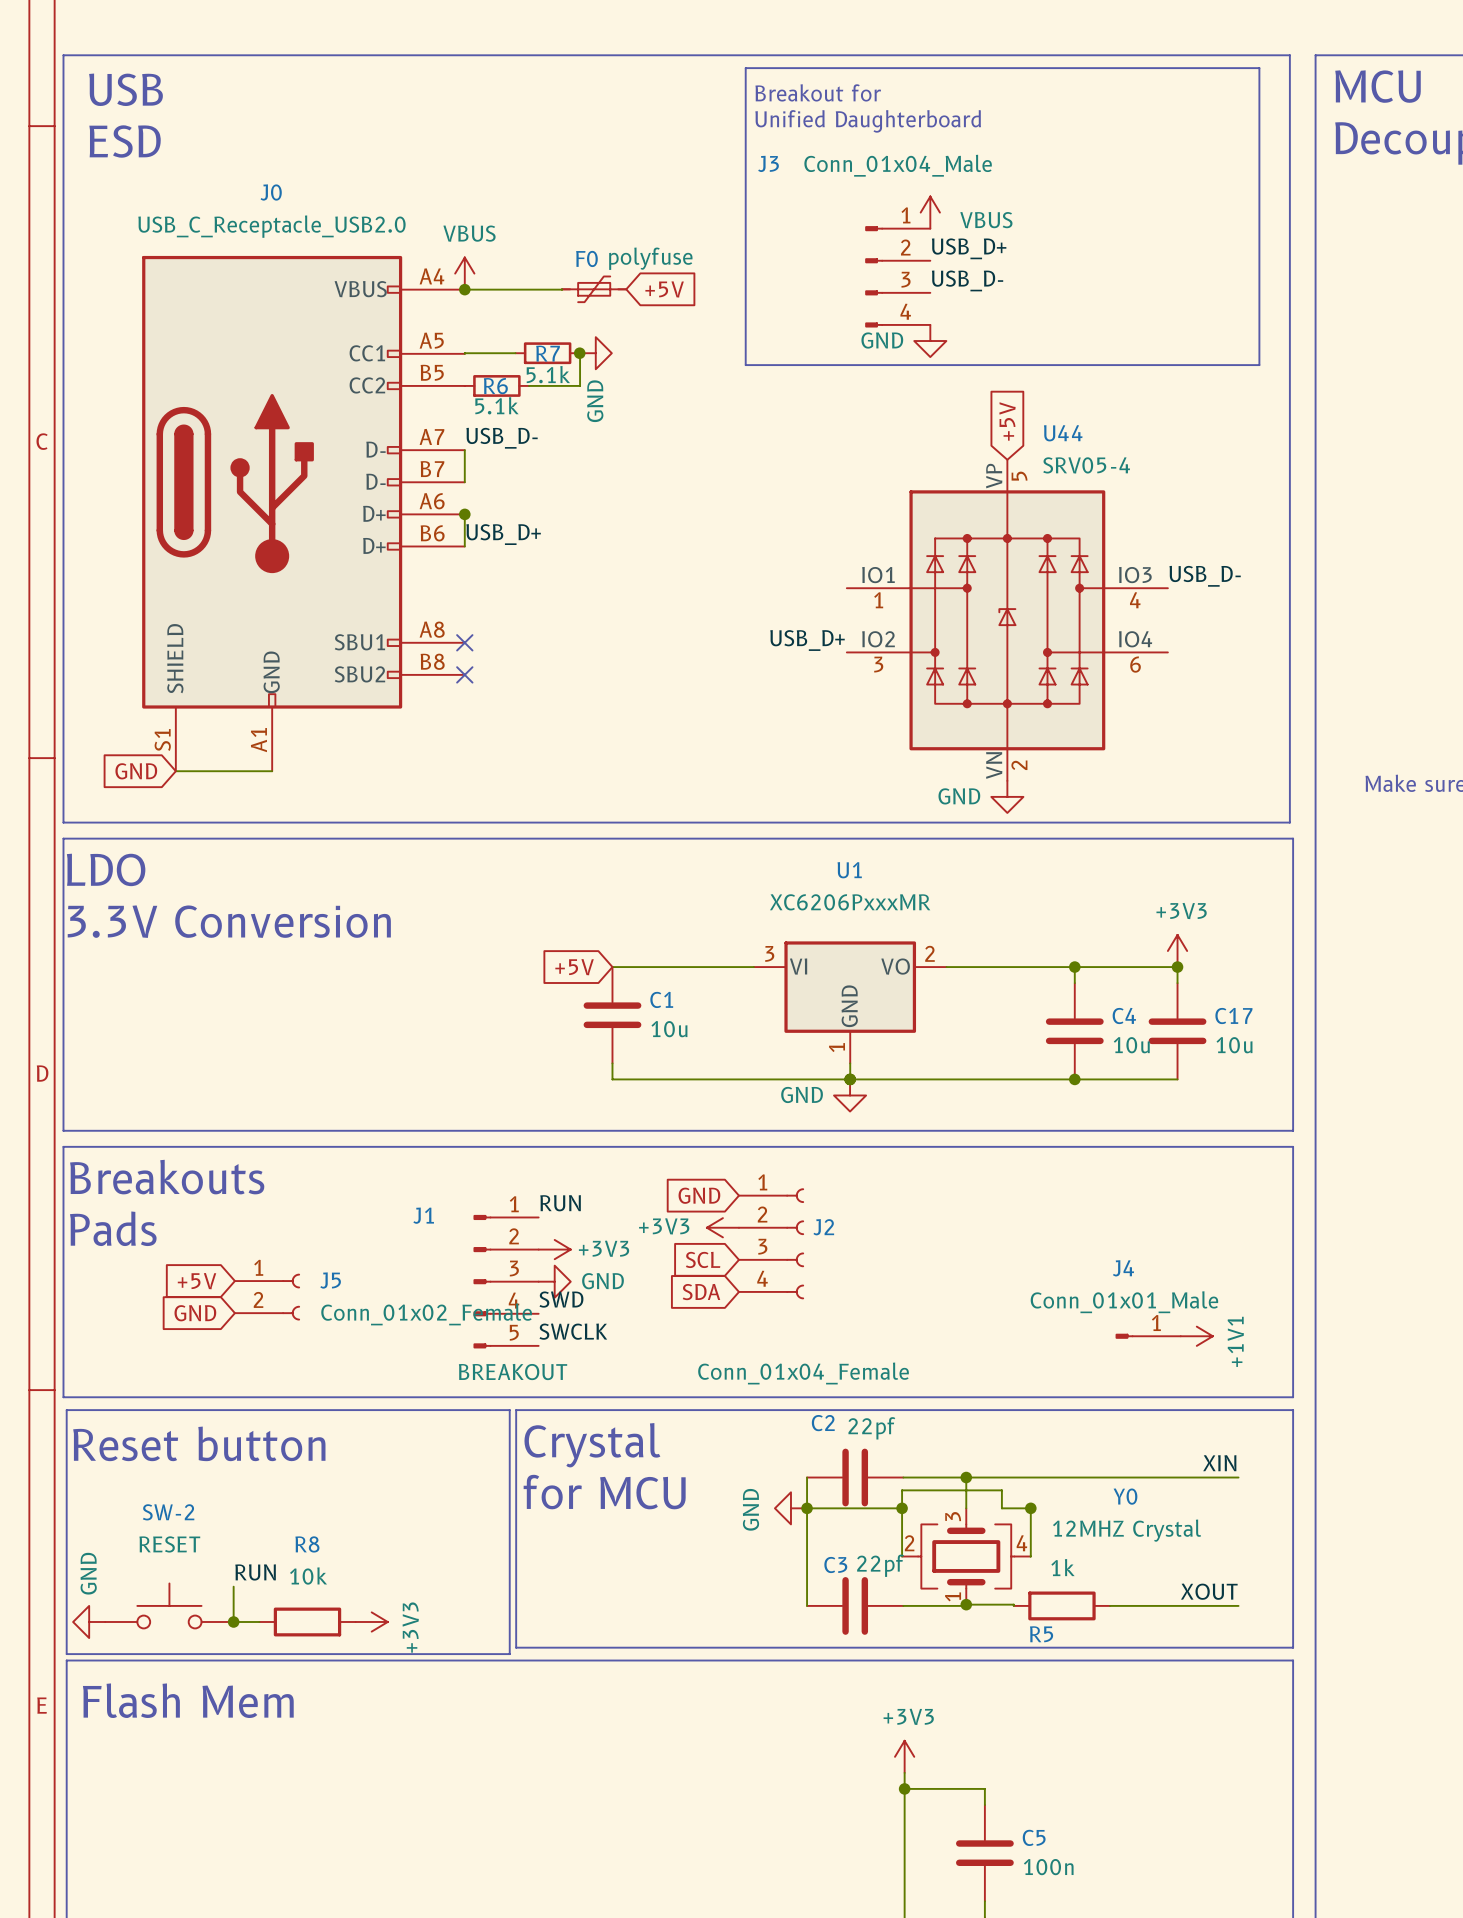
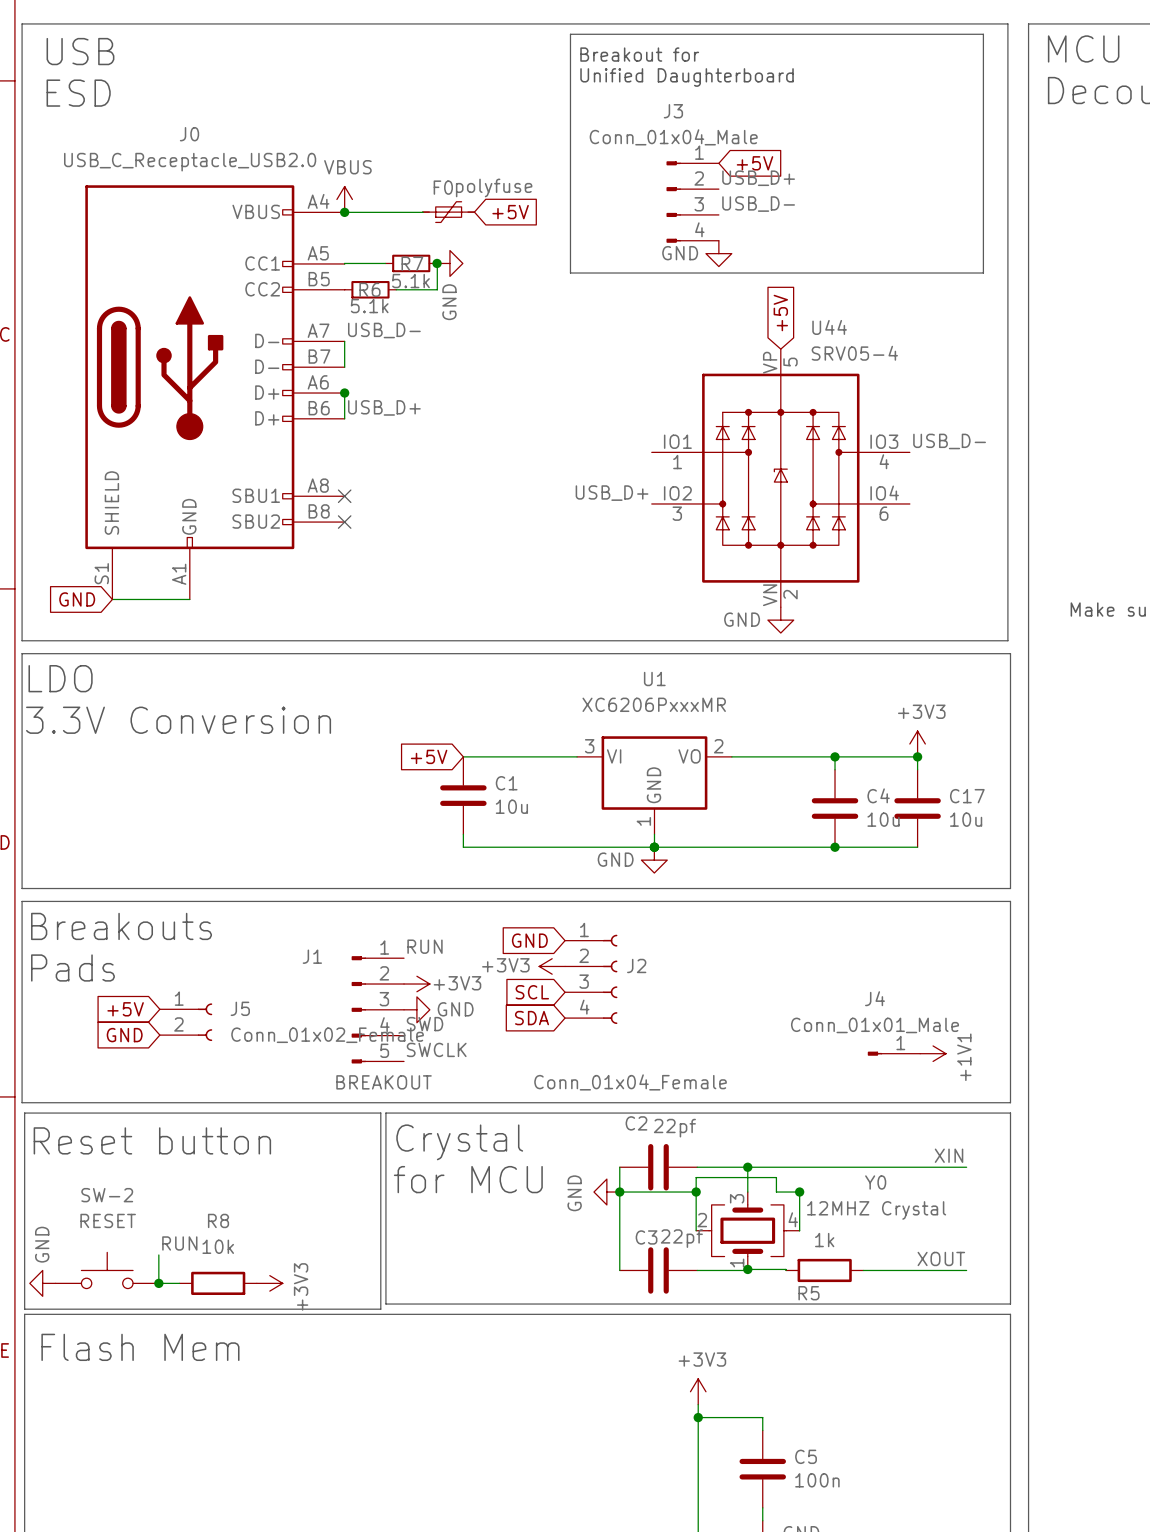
J3 name position: J3 (768, 163) -> J3 (673, 111)
J3 value position: Conn_01x04_Male (898, 165) -> Conn_01x04_Male (673, 137)
power symbol: VBUS (930, 212) -> none
global label: none -> +5V (754, 163)

